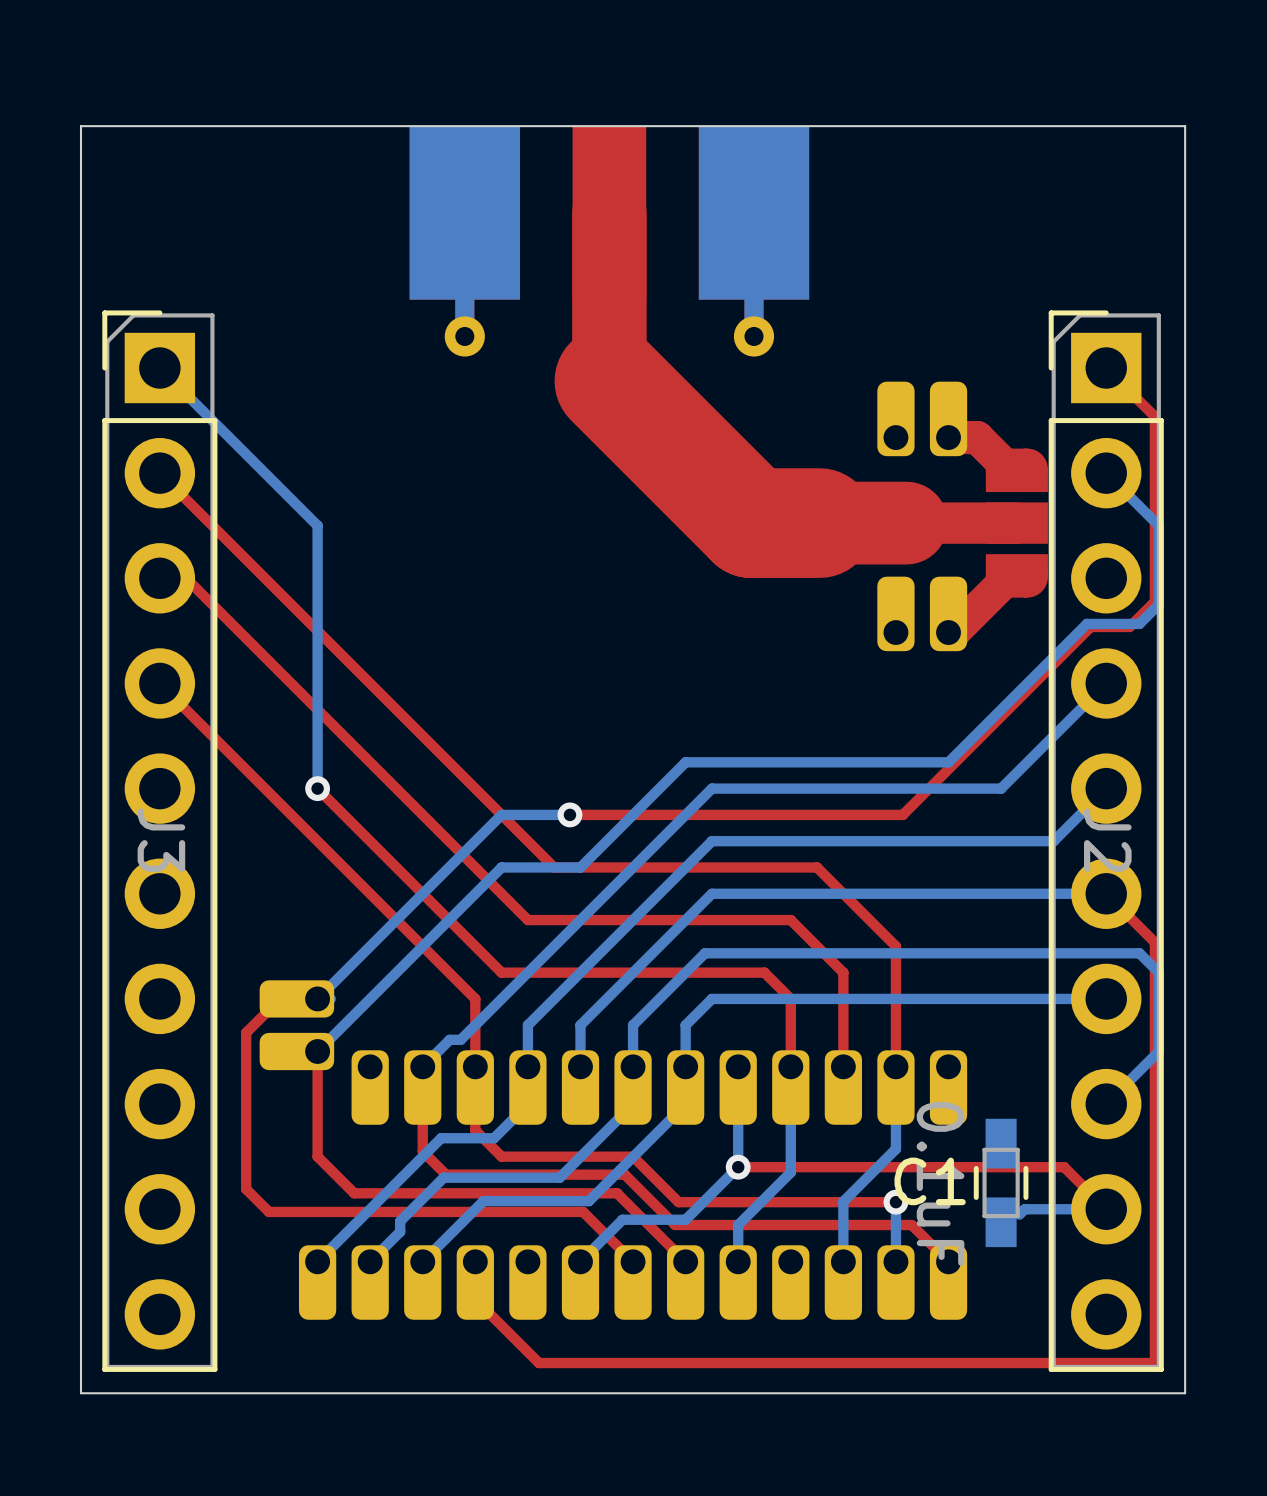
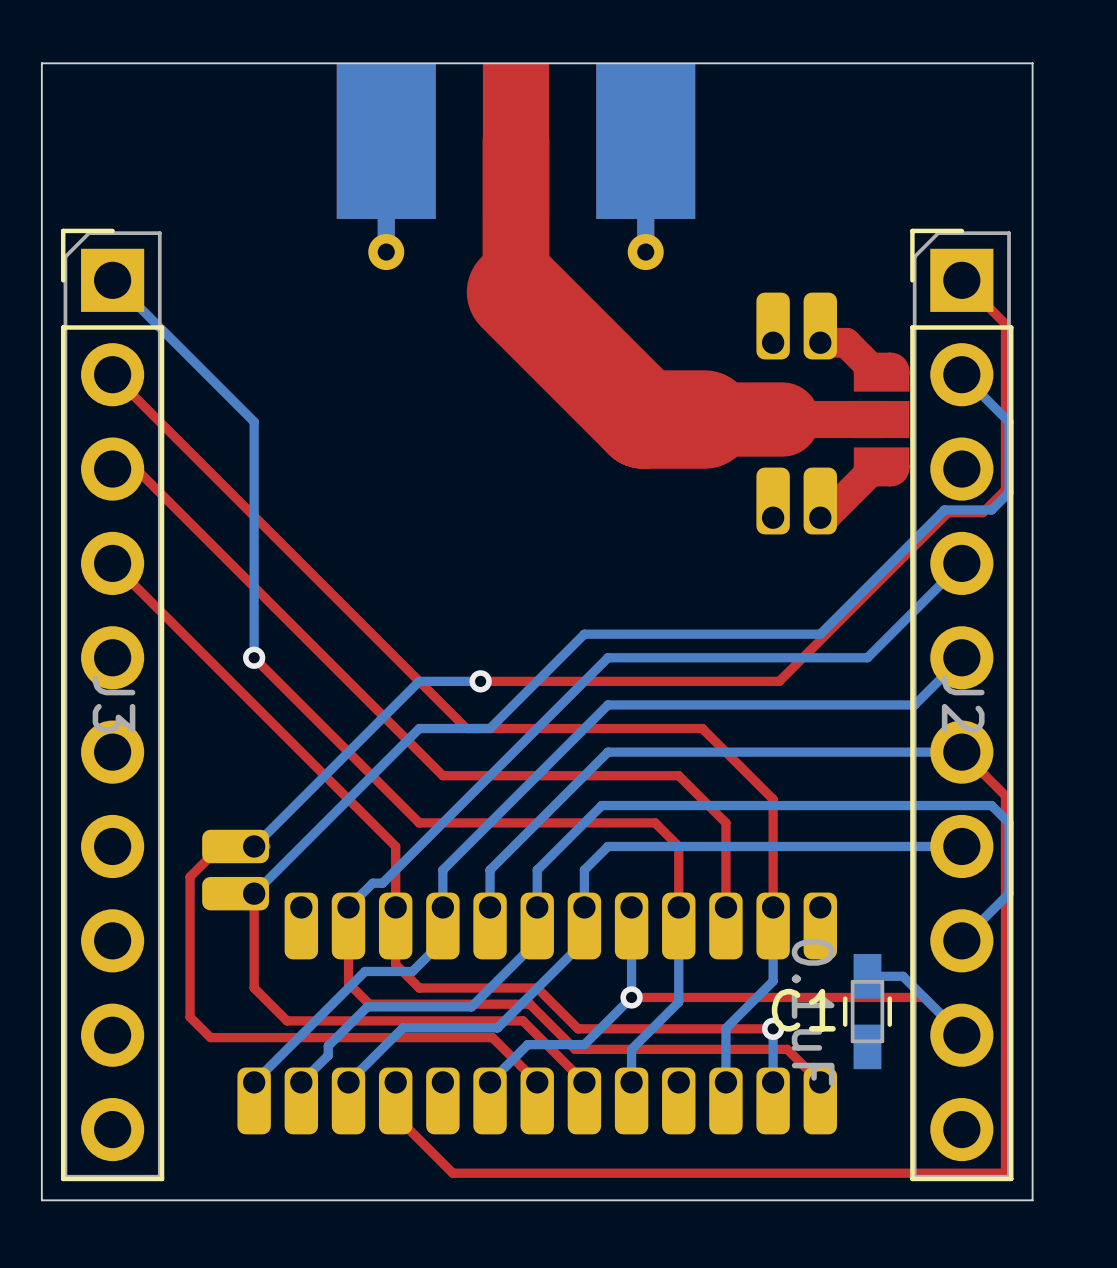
bottom track: (1106, 1209) (1024, 1209) (1019, 1214) -> (961, 1035) (902, 976) (867, 976)

